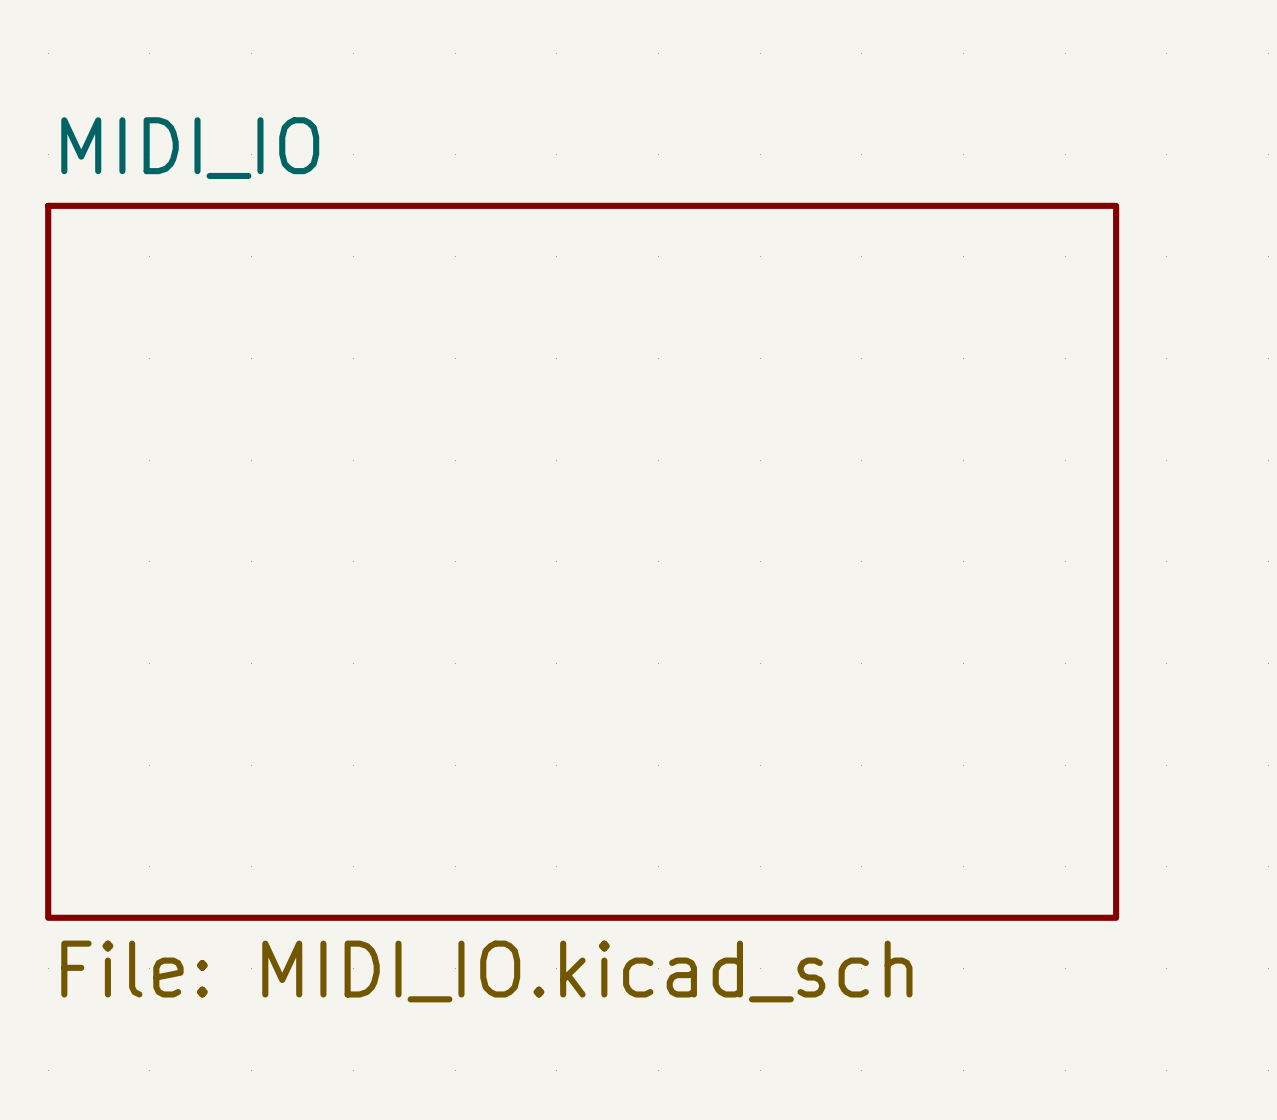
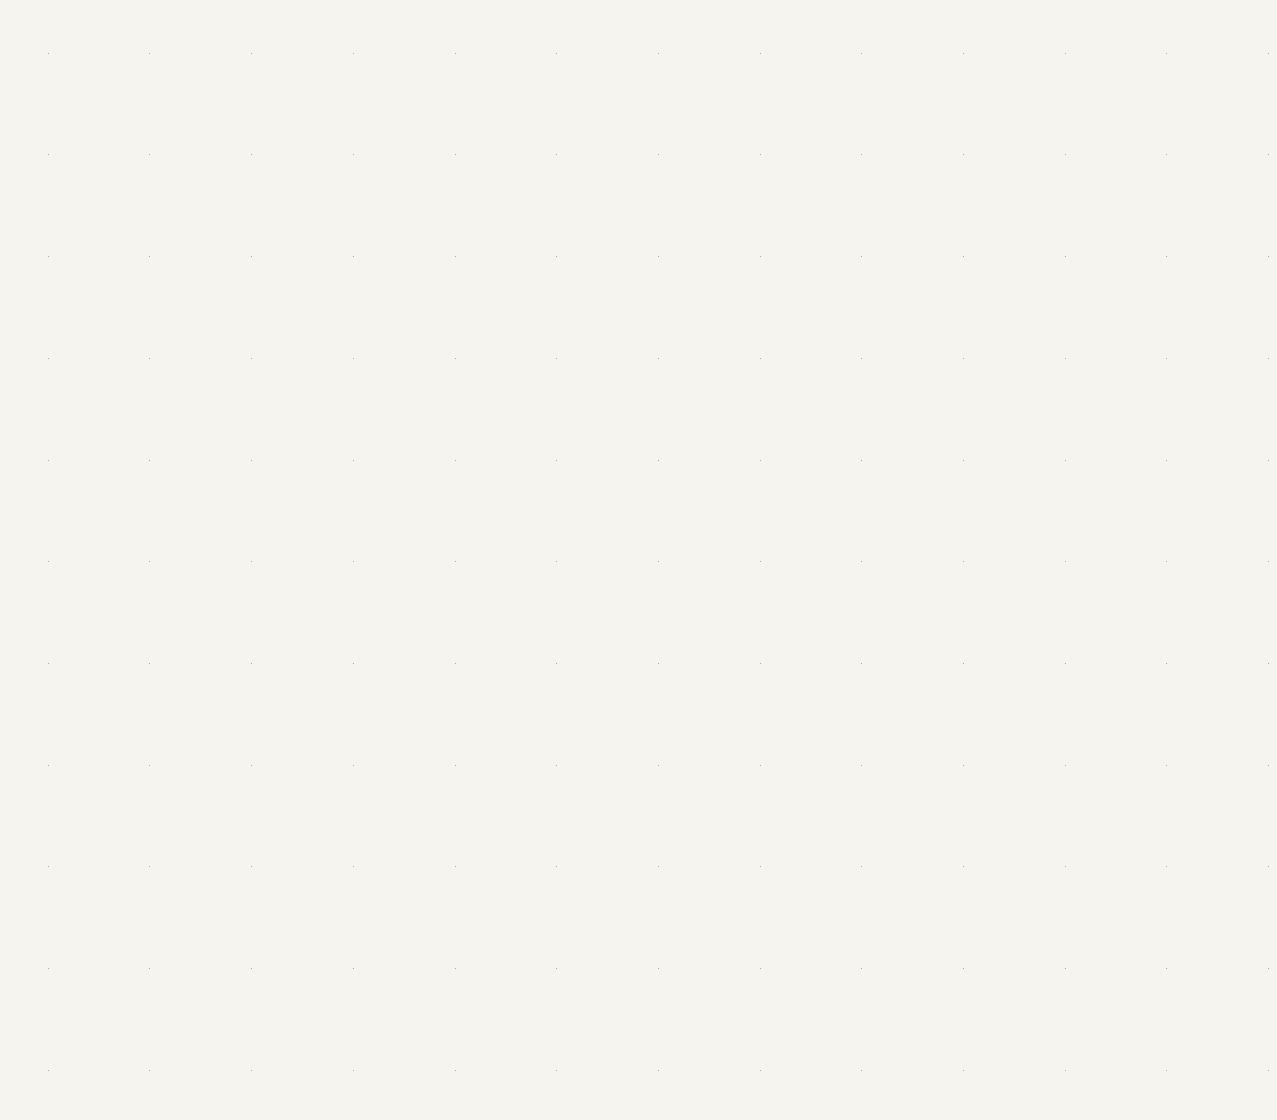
sheet MIDI_IO: File: MIDI_IO.kicad_sch (582, 561) -> none

